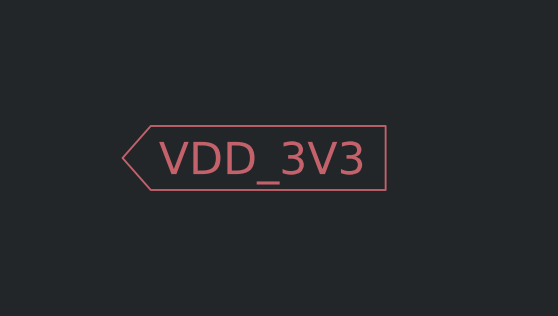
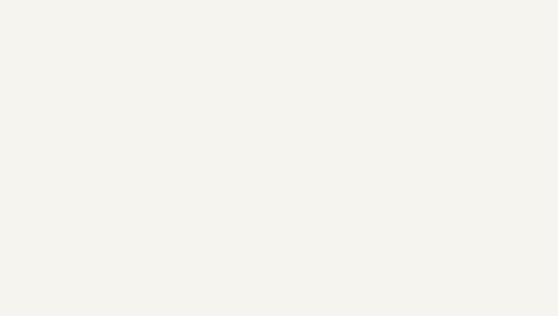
global label: VDD_3V3 (260, 162) -> none

